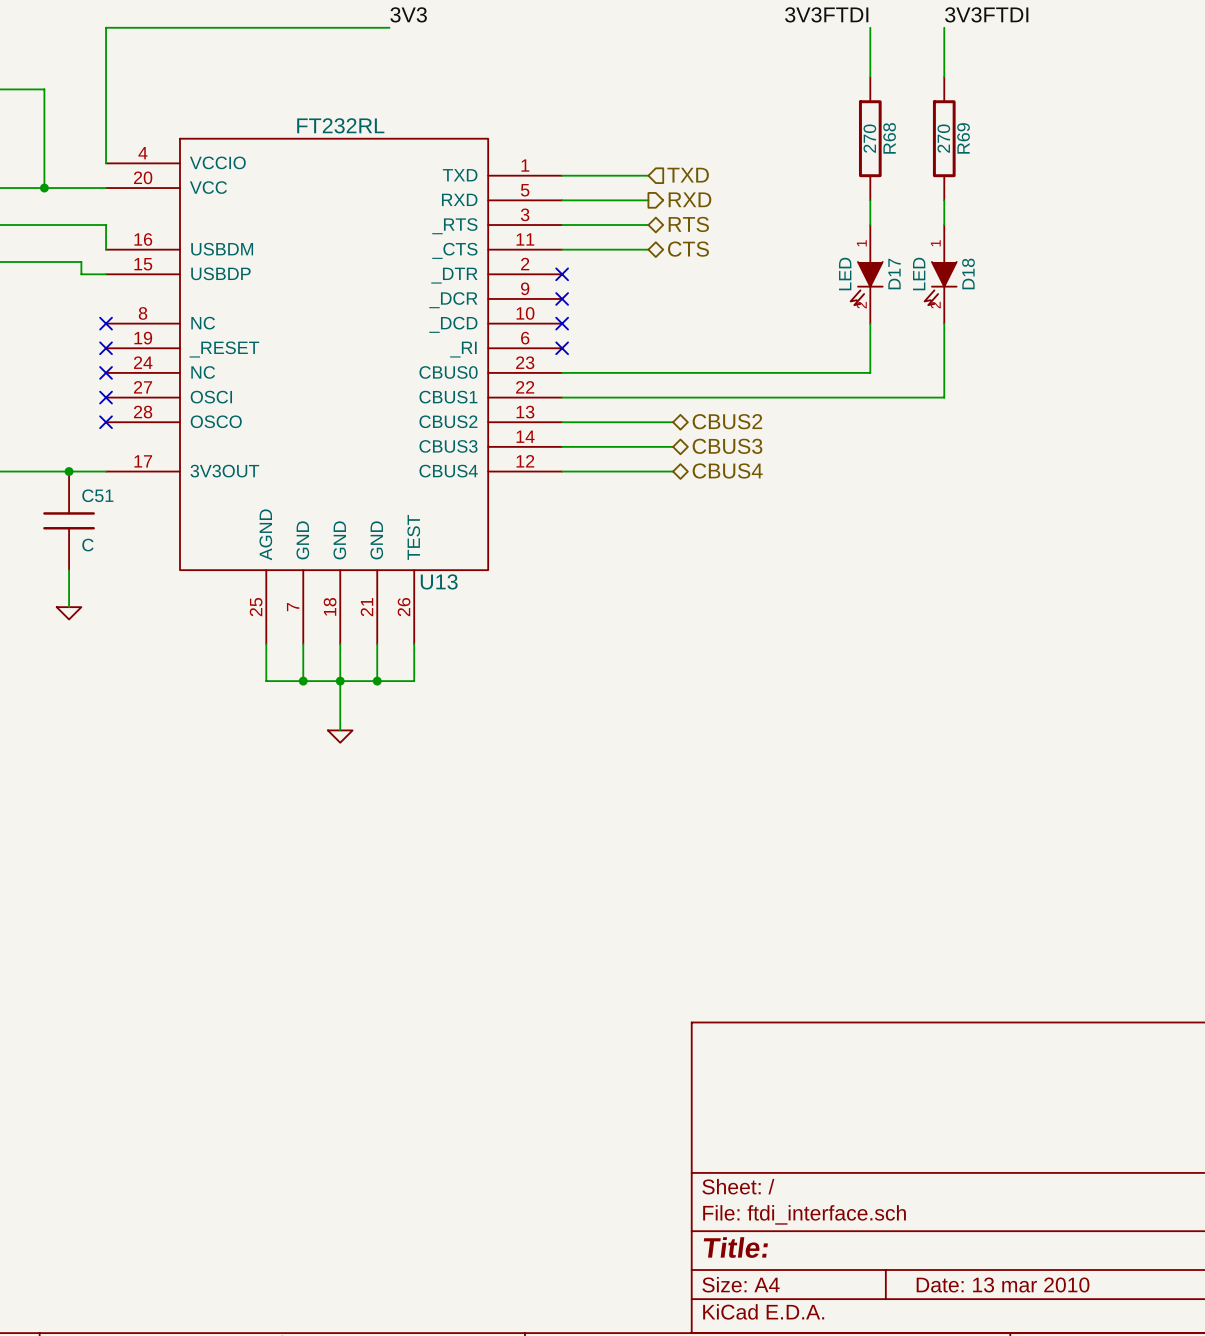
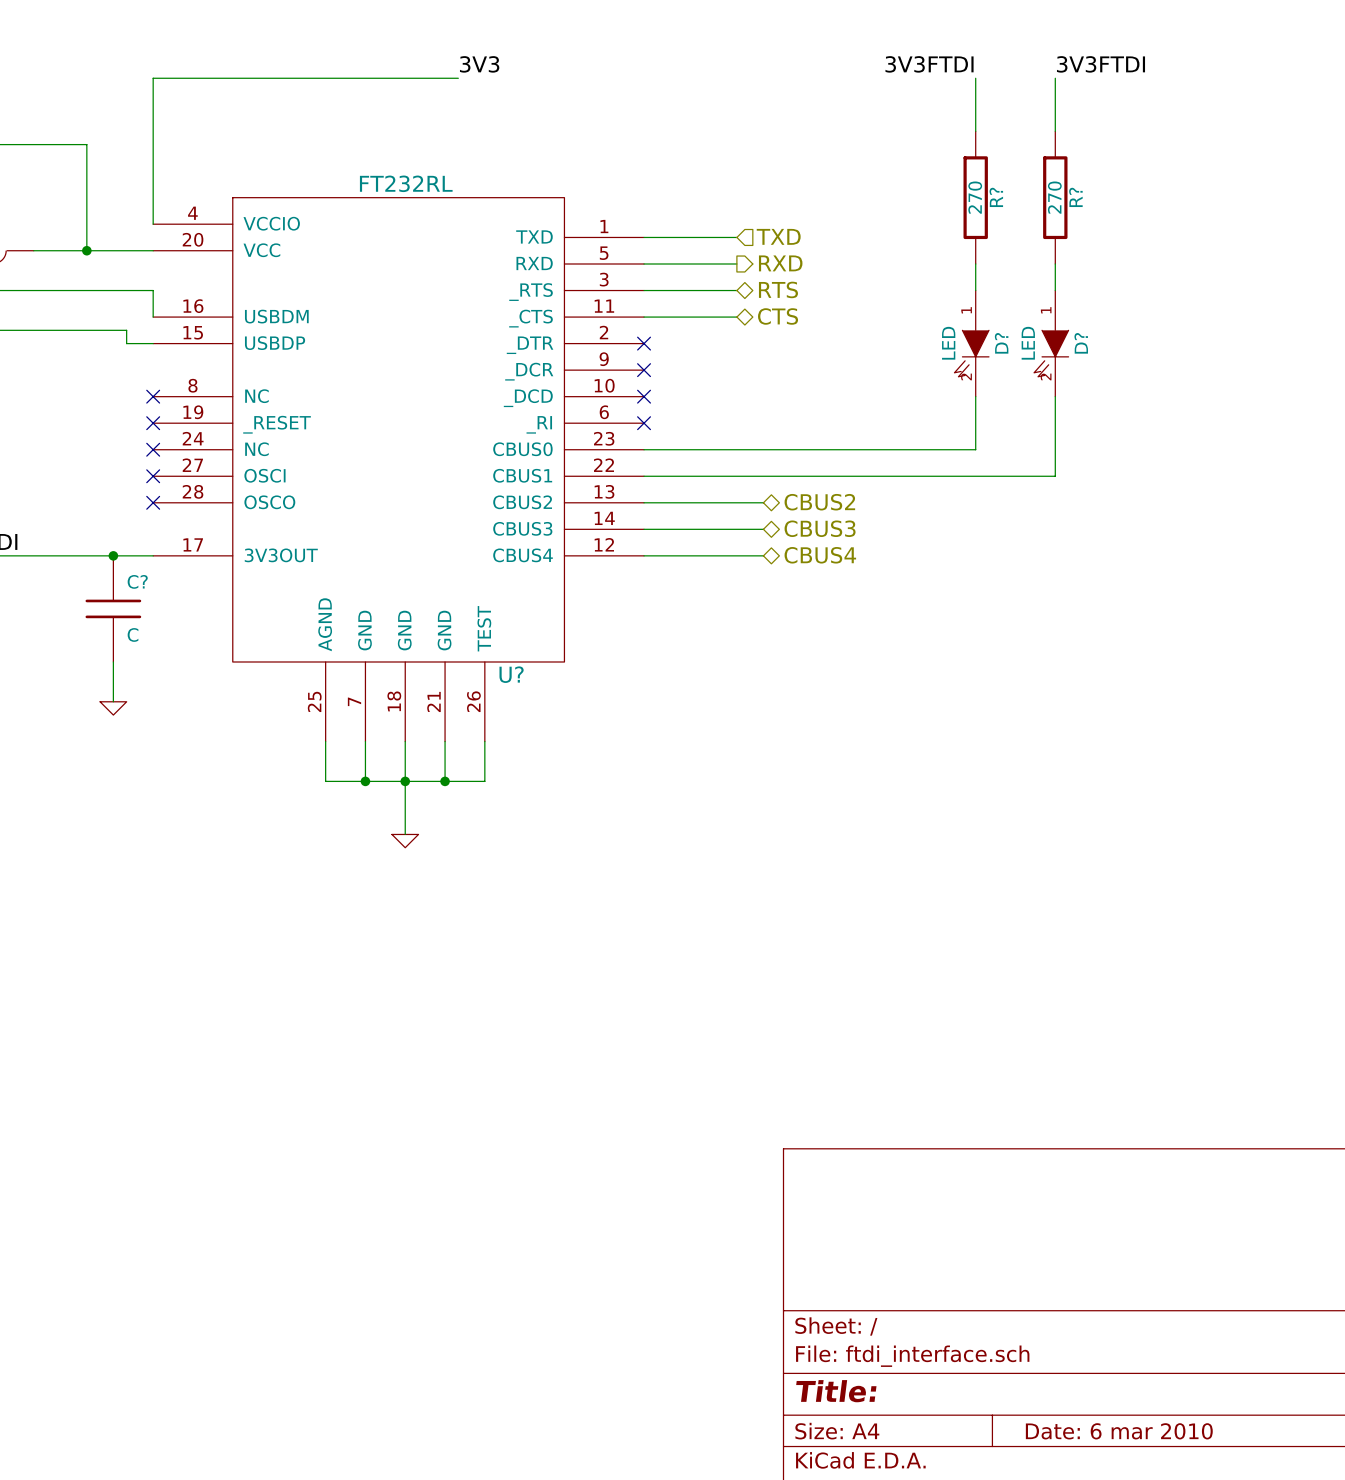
R68 name: R68 (889, 138) -> R? (996, 197)
R69 name: R69 (963, 138) -> R? (1075, 197)
D18 name: D18 (968, 273) -> D? (1081, 343)
D17 name: D17 (894, 274) -> D? (1001, 343)
C51 name: C51 (97, 495) -> C? (137, 581)
U13 name: U13 (439, 581) -> U? (511, 674)
title block: Date: 13 mar 2010 (1003, 1284) -> Date: 6 mar 2010 (1119, 1431)

